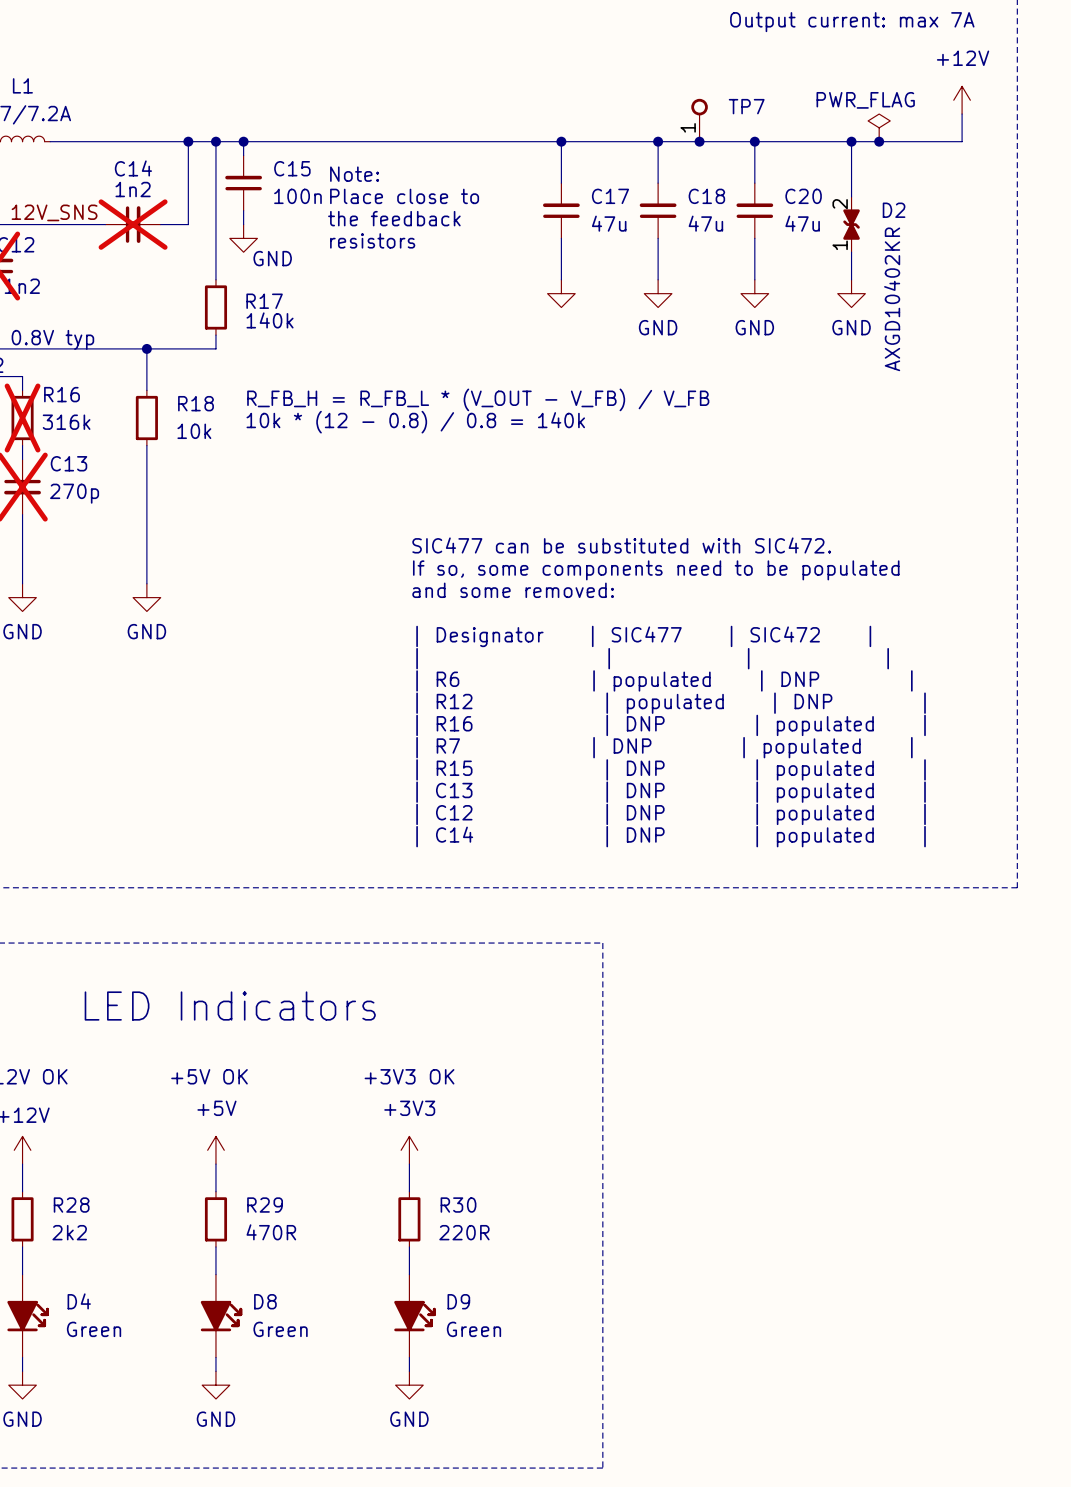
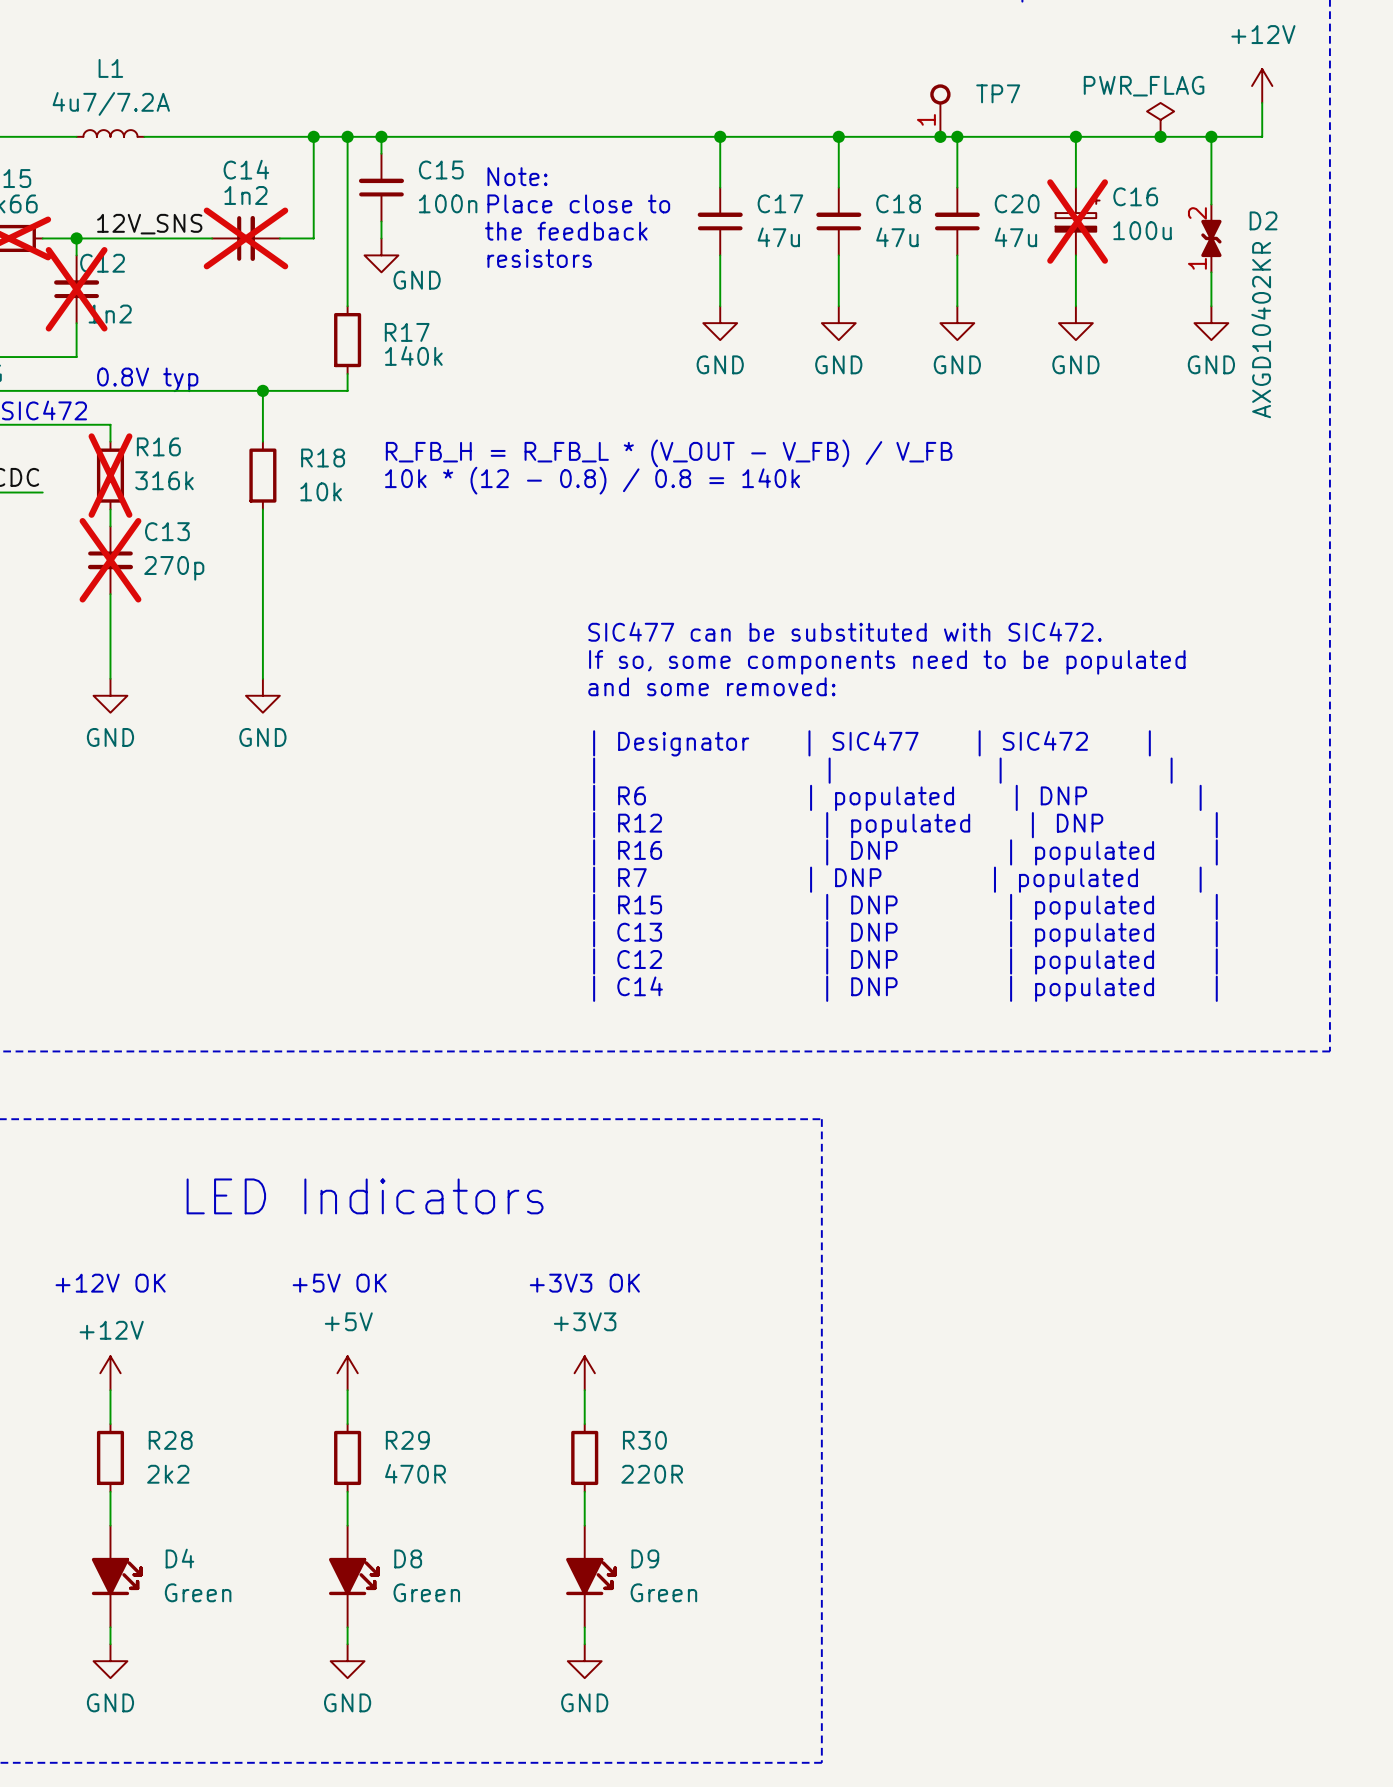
junction: none -> (720, 136)
wire: (561, 141) (561, 183) -> (720, 136) (720, 187)
junction: (561, 141) -> none
junction: none -> (838, 136)
wire: (658, 141) (658, 183) -> (838, 136) (838, 187)
junction: (658, 141) -> none
junction: none -> (957, 136)
wire: (754, 141) (754, 183) -> (957, 136) (957, 187)
junction: (754, 141) -> none
wire: none -> (1075, 136) (1075, 187)
junction: none -> (1075, 136)
wire: (851, 141) (851, 196) -> (1211, 136) (1211, 204)
junction: (851, 141) -> none
junction: none -> (1211, 136)
C17 position: (561, 210) -> (720, 221)
C18 position: (658, 210) -> (838, 221)
C20 position: (754, 210) -> (957, 221)
C16: none -> (1077, 221)
D2 position: (851, 224) -> (1211, 238)
wire: (561, 238) (561, 279) -> (720, 255) (720, 306)
wire: (658, 238) (658, 279) -> (838, 255) (838, 306)
wire: (754, 238) (754, 279) -> (957, 255) (957, 306)
wire: none -> (1075, 255) (1075, 306)
wire: (851, 252) (851, 279) -> (1211, 272) (1211, 306)
power symbol: none -> GND (720, 323)
power symbol: (561, 293) -> none
power symbol: none -> GND (838, 323)
power symbol: GND (658, 293) -> none
power symbol: none -> GND (957, 323)
power symbol: GND (754, 293) -> none
power symbol: none -> GND (1075, 323)
power symbol: GND (851, 293) -> none
power symbol: none -> GND (1211, 323)

